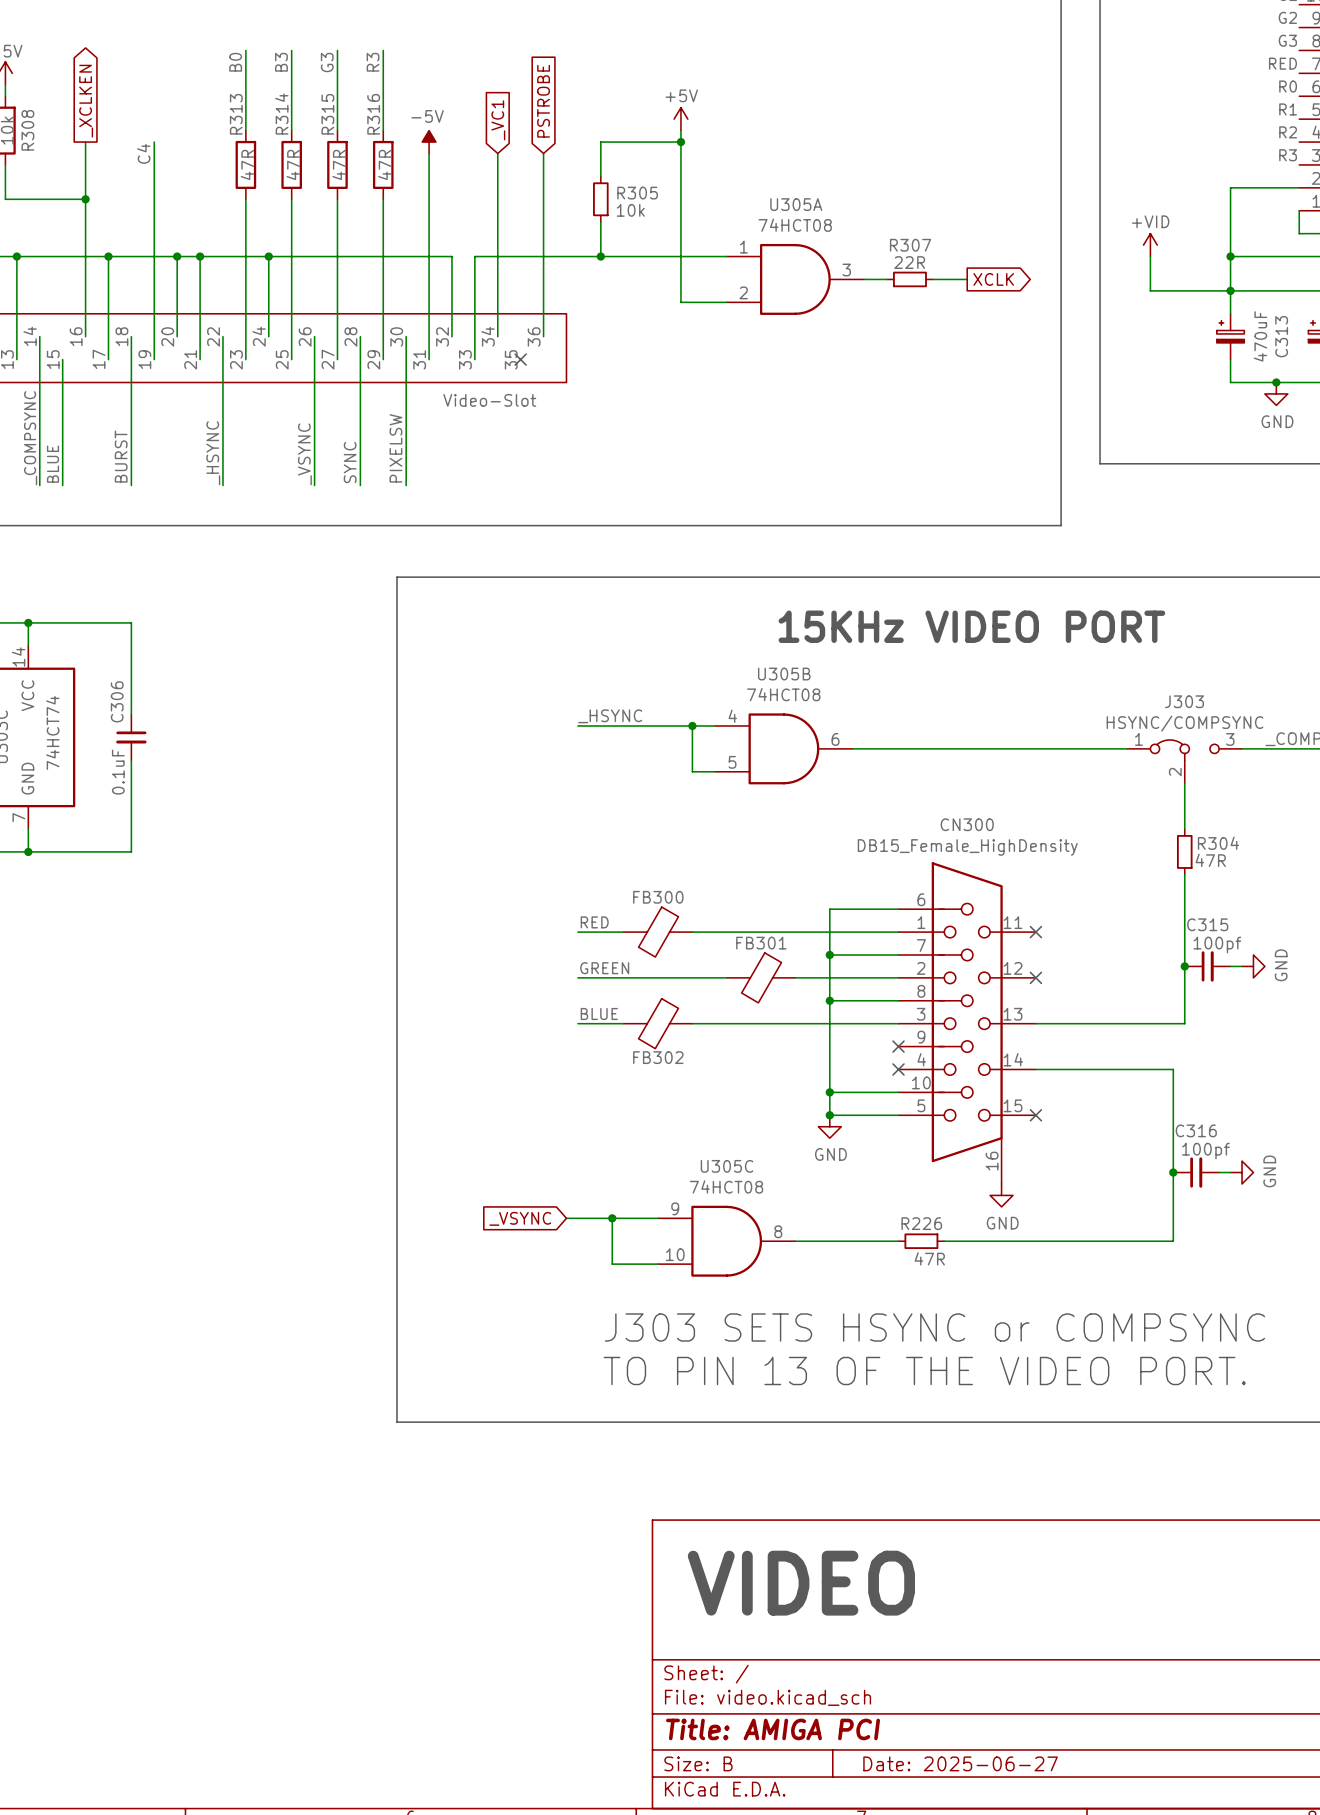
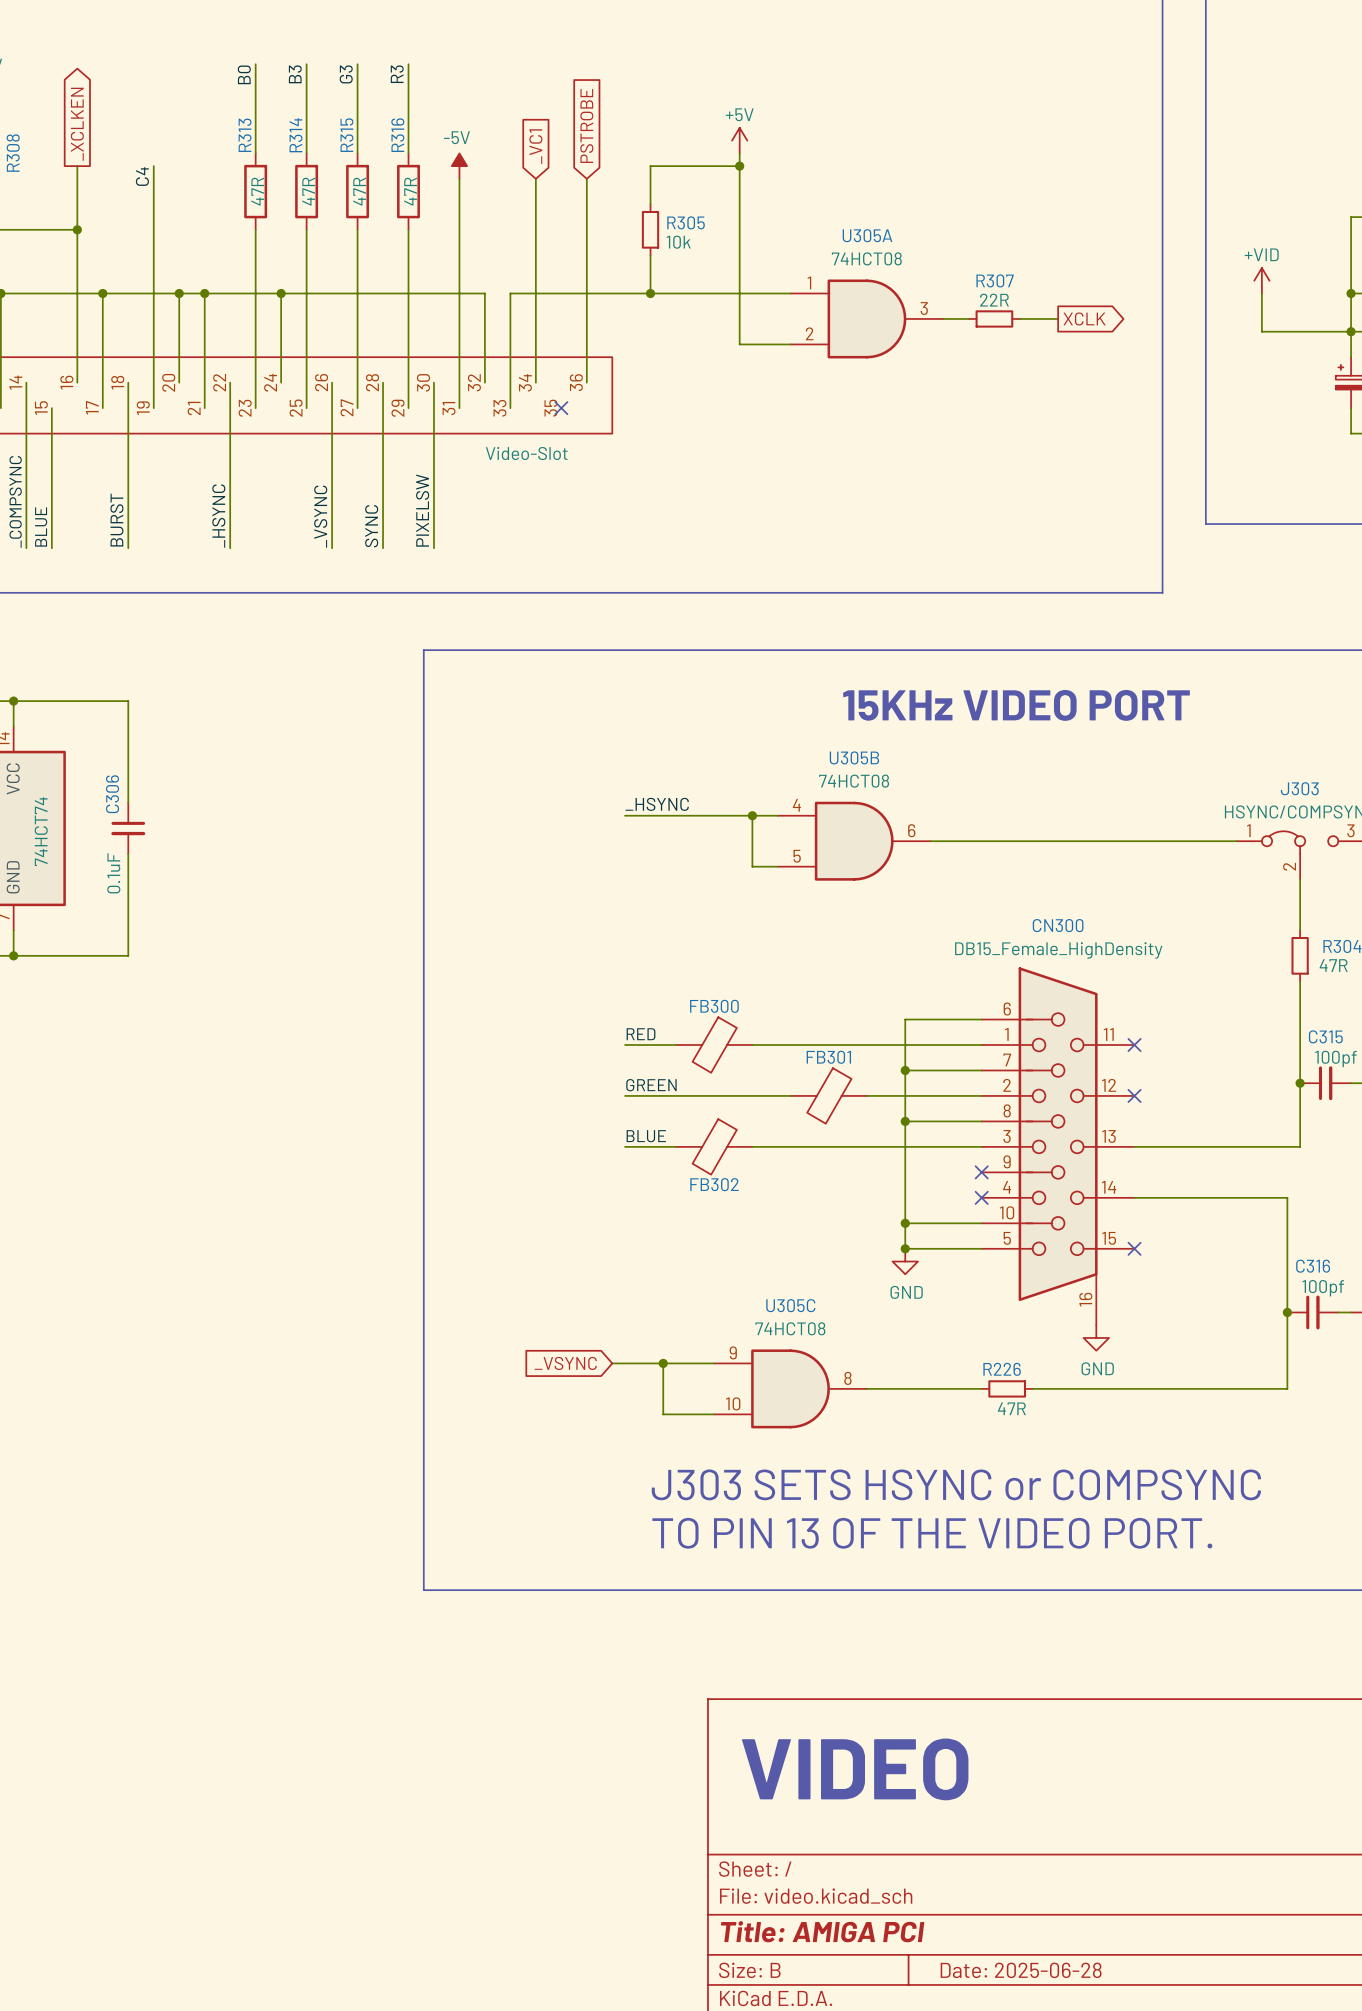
title block: Date: 2025-06-27 (960, 1763) -> Date: 2025-06-28 (1021, 1970)

